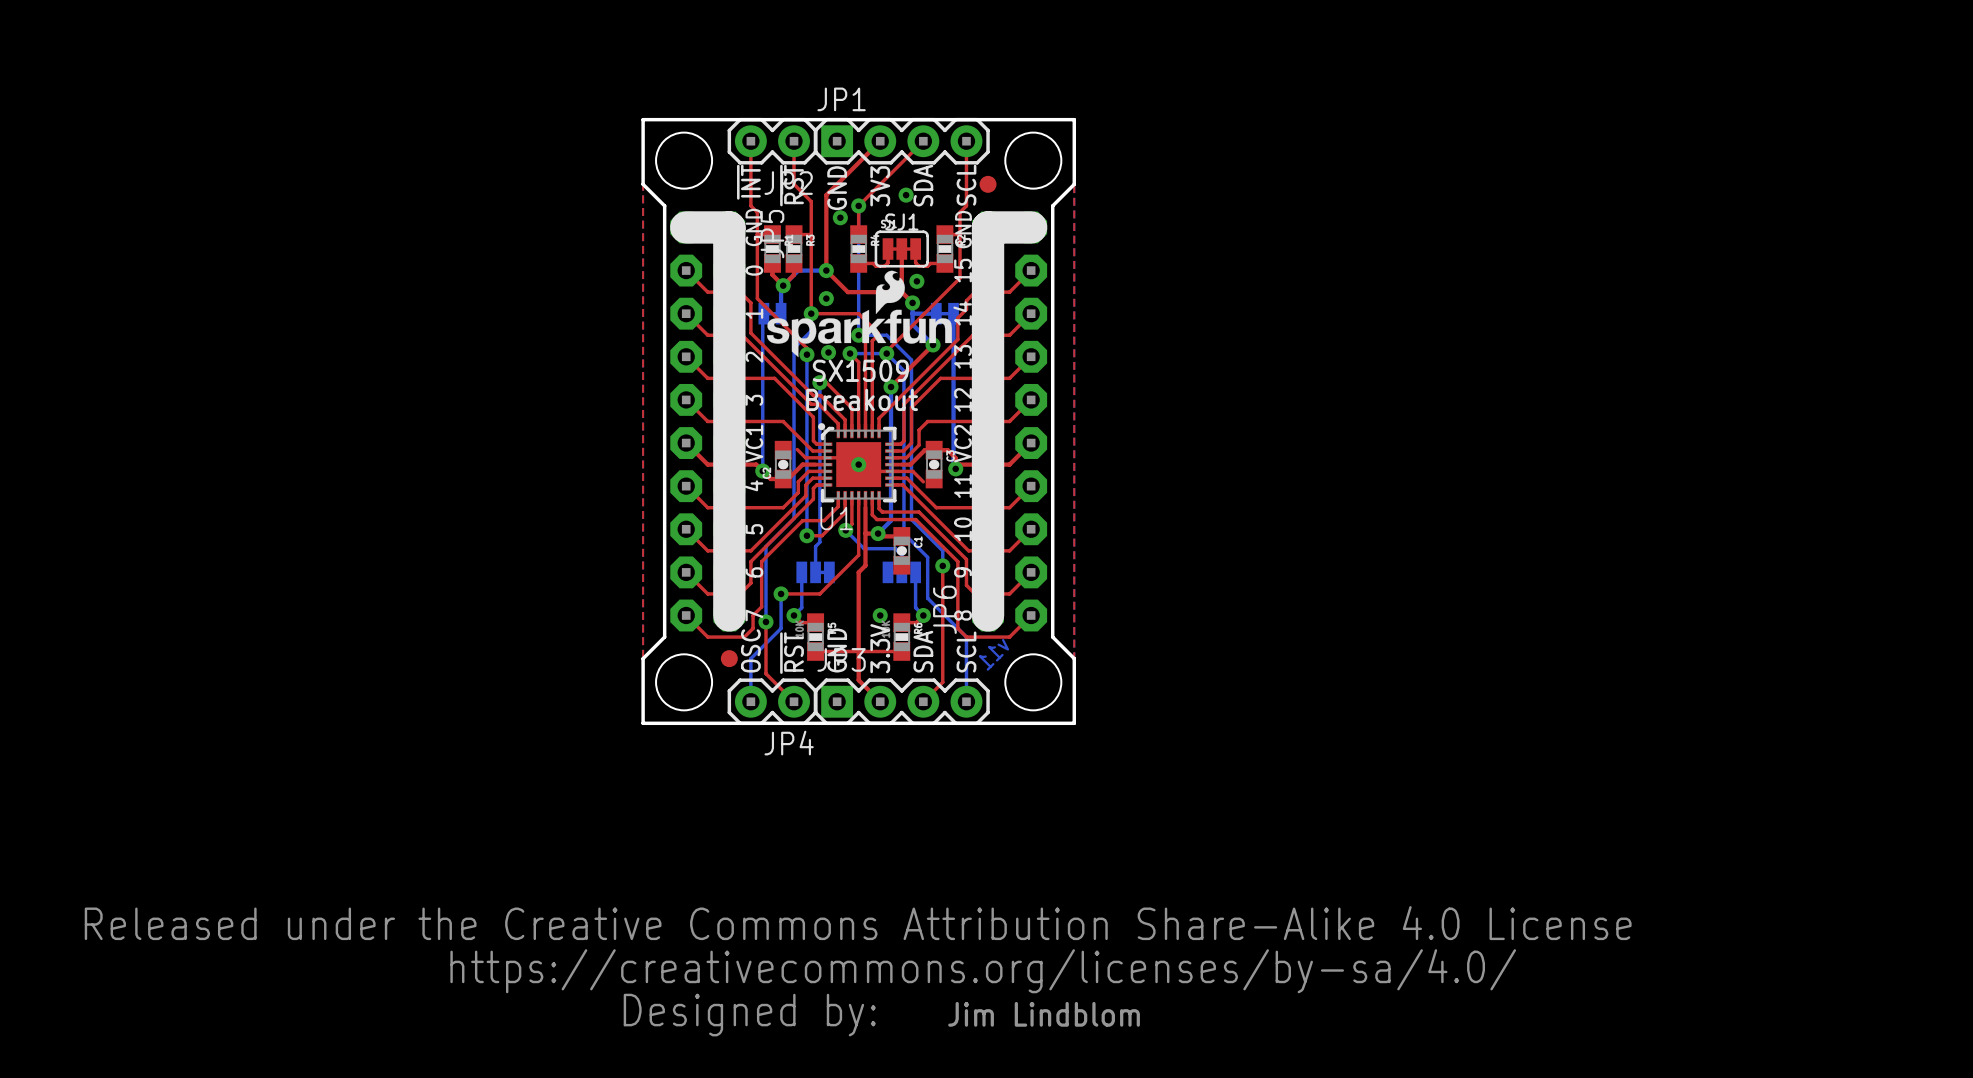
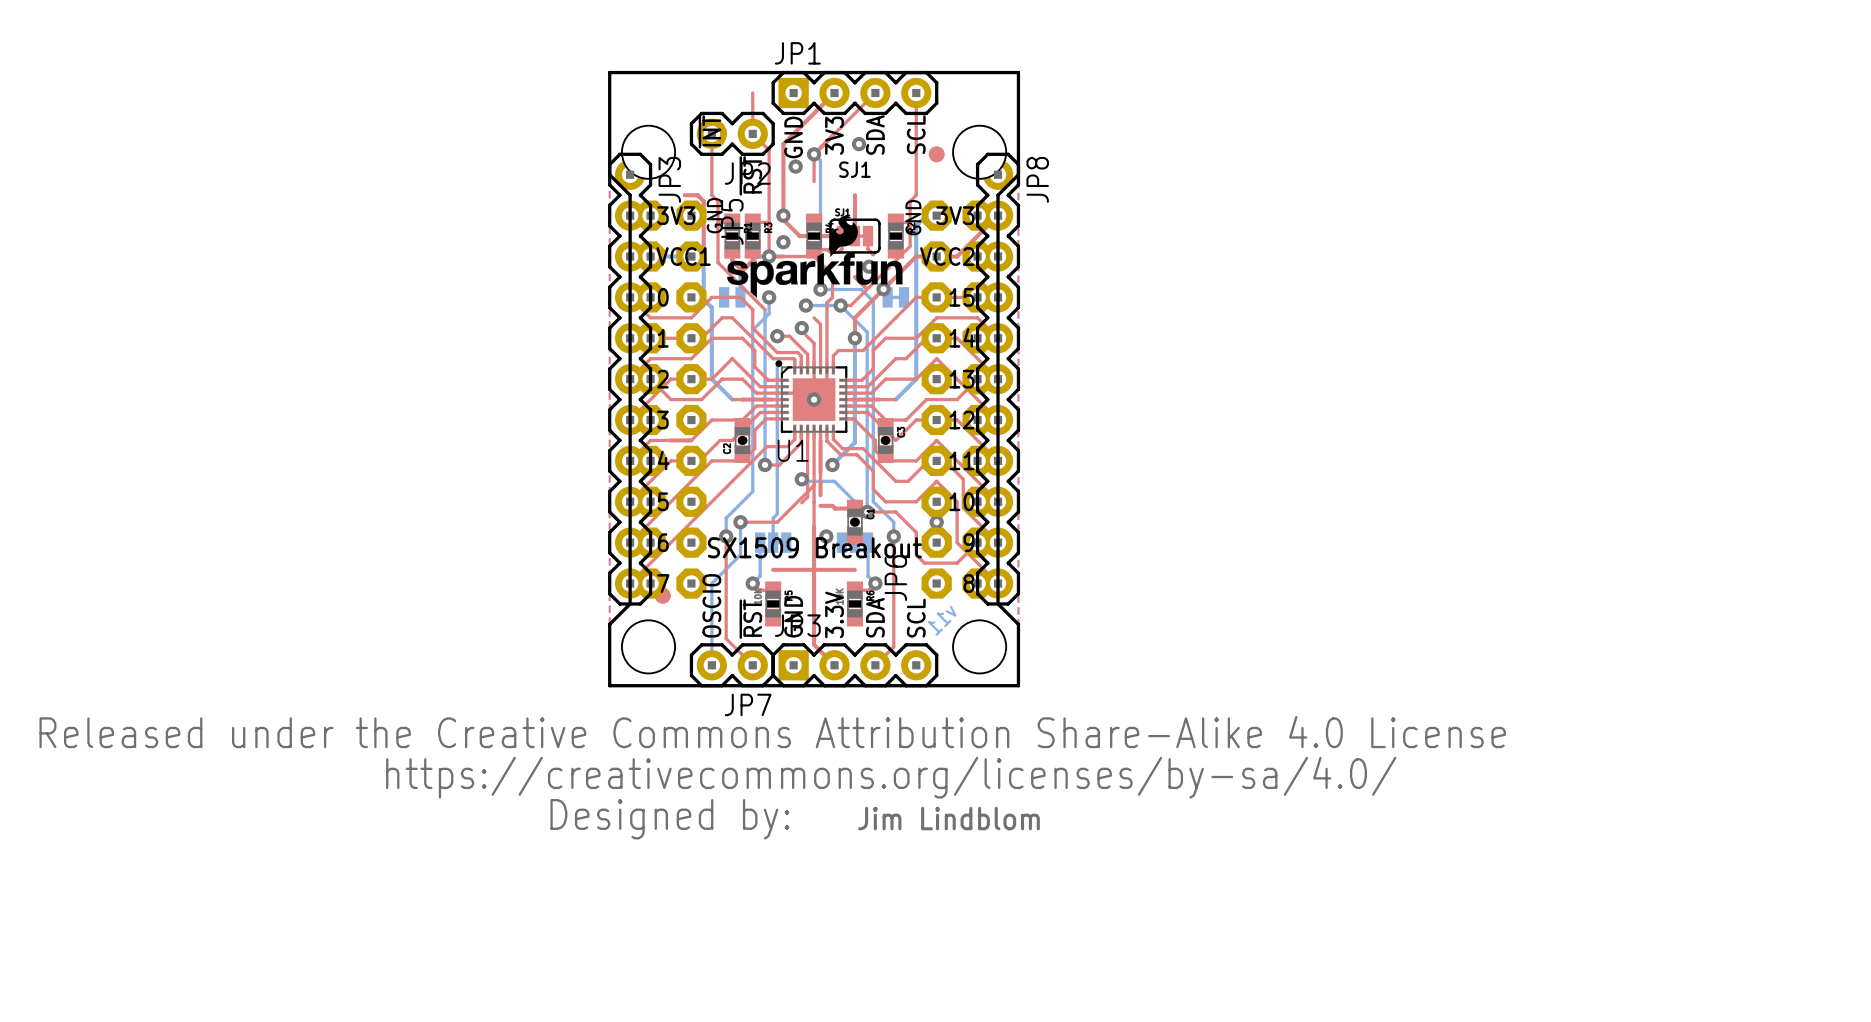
top track: none -> (834, 93) (783, 144) (783, 184)
top track: none -> (875, 93) (834, 133)
top track: none -> (916, 93) (916, 133)
board edge: (643, 119) (1074, 119) -> (609, 113) (609, 72) (1018, 72) (1018, 113)
top track: (794, 141) (794, 184) (811, 201) -> (752, 93) (752, 133) (769, 150) (769, 191)
JP1 position: (901, 141) -> (854, 93)
top track: (923, 141) (858, 205) (858, 234) -> none
via: none -> (859, 144)
top track: (858, 162) (826, 195) -> (814, 154) (814, 181)
via: none -> (814, 154)
via: none -> (795, 166)
text position: ~{INT} (748, 182) -> ~{INT} (710, 131)
part position: (988, 184) -> (936, 154)
text position: SDA (923, 185) -> SDA (875, 135)
text position: SCL (966, 185) -> SCL (916, 134)
text position: 3V3 (880, 186) -> 3V3 (834, 135)
text position: GND (837, 188) -> GND (793, 137)
via: (906, 195) -> none
top track: none -> (684, 195) (697, 195) (703, 201) (703, 256)
bottom track: (858, 205) (858, 335) (886, 335) (911, 360) (911, 519) (921, 529) -> (814, 154) (820, 160) (820, 289) (861, 289) (873, 301) (873, 501)
via: (858, 205) -> none
via position: (840, 217) -> (783, 215)
text position: SJ1 (901, 222) -> SJ1 (854, 169)
line: (686, 227) (729, 227) (729, 615) -> none
text: none -> 3V3 (676, 215)
text: none -> 3V3 (955, 215)
line: (1031, 227) (988, 227) (988, 615) -> none
top track: none -> (998, 215) (957, 256) (916, 256) (854, 317) (854, 338)
top track: (826, 231) (826, 270) (847, 292) (901, 292) (901, 249) -> (783, 219) (799, 236) (854, 236) (854, 195)
bottom track: none -> (922, 219) (916, 225) (916, 379) (895, 399)
via: none -> (783, 242)
top track: (960, 259) (960, 278) (886, 351) (886, 353) -> (910, 246) (850, 305) (840, 305)
top track: (944, 263) (930, 263) (927, 266) (919, 266) -> (873, 254) (871, 252)
bottom track: none -> (630, 256) (703, 256) (703, 299) (711, 307) (711, 379) (732, 399)
top track: (686, 270) (707, 292) (740, 292) (750, 302) (750, 333) (813, 395) (820, 395) (845, 419) (845, 431) -> none
text: none -> VCC1 (683, 256)
text rotation: 0° (754, 270) -> 90° clockwise (663, 297)
text position: 0 (754, 270) -> 0 (663, 297)
top track: (811, 270) (811, 313) (858, 313) (878, 333) (872, 341) -> (769, 256) (814, 256) (832, 274) (832, 297) (826, 302) (826, 323)
via: none -> (769, 256)
via: (826, 270) -> none
text rotation: 0° (963, 270) -> 90° clockwise (961, 297)
text position: 15 (963, 270) -> 15 (961, 297)
text: none -> VCC2 (947, 256)
top track: (1031, 270) (1009, 292) (975, 292) (966, 300) (966, 309) (957, 318) (957, 339) (879, 418) (879, 431) -> none
top track: (757, 277) (757, 298) (806, 348) (806, 354) -> (718, 262) (765, 309)
via: (783, 285) -> none
via: (826, 298) -> none
bottom track: (912, 302) (912, 324) (933, 344) -> none
via: (912, 302) -> none
via: none -> (820, 289)
via: none -> (883, 289)
top track: (686, 313) (707, 335) -> (630, 297) (650, 317) (671, 317)
text rotation: 0° (754, 313) -> 90° clockwise (663, 338)
text position: 1 (754, 313) -> 1 (663, 338)
bottom track: (763, 313) (762, 471) -> none
bottom track: (912, 313) (936, 313) -> none
bottom track: (953, 313) (953, 466) (955, 468) -> none
text rotation: 0° (962, 313) -> 90° clockwise (962, 337)
text position: 14 (962, 313) -> 14 (962, 337)
top track: (1031, 313) (1009, 335) -> (998, 338) (977, 317) (957, 317)
top track: none -> (998, 297) (916, 297) (863, 350) (838, 350) (833, 355) (833, 367)
drawing position: (859, 314) -> (814, 256)
bottom track: none -> (805, 305) (840, 305) (867, 332) (867, 511)
via: none -> (805, 305)
via: none -> (840, 305)
bottom track: none -> (765, 309) (765, 336)
top track: (729, 335) (742, 335) (811, 404) (818, 404) (838, 423) (838, 431) -> (691, 317) (711, 297) (740, 297) (752, 309) (752, 328) (777, 352) (797, 352) (801, 356) (801, 367)
via: (858, 335) -> none
top track: (988, 335) (972, 335) (903, 404) (903, 440) (900, 444) (892, 444) -> (936, 317) (916, 338) (885, 338) (873, 350) (873, 368) (862, 380) (845, 380)
top track: (933, 344) (891, 386) -> none
via: (933, 344) -> none
via: none -> (801, 328)
via: (828, 352) -> none
bottom track: (850, 353) (886, 353) (903, 370) (903, 533) (927, 557) (927, 598) (966, 637) (966, 701) -> none
via: (850, 353) -> none
via position: (886, 353) -> (854, 338)
via: (806, 354) -> none
top track: none -> (777, 336) (789, 336) (807, 354) (807, 367)
via: none -> (777, 336)
top track: none -> (630, 338) (701, 338) (722, 317) (732, 317) (773, 358) (793, 358) (794, 367)
top track: (686, 356) (707, 378) -> (630, 379) (650, 358) (671, 358)
bottom track: none -> (854, 338) (854, 442) (832, 464)
text rotation: 0° (963, 356) -> 90° clockwise (961, 379)
text position: 13 (963, 356) -> 13 (961, 379)
top track: (1031, 356) (1009, 378) (955, 378) -> (998, 379) (957, 338) (926, 338) (906, 358)
text rotation: 0° (754, 357) -> 90° clockwise (662, 379)
text position: 2 (754, 357) -> 2 (662, 379)
text: SX1509 (860, 370) -> none
top track: (729, 378) (774, 378) (813, 417) (813, 440) (816, 444) (825, 444) -> (691, 358) (711, 338) (742, 338) (754, 350) (754, 366) (768, 380) (782, 380)
top track: (944, 378) (940, 378) (911, 407) (911, 443) (903, 451) (892, 451) -> (895, 358) (867, 386) (845, 386)
top track: (819, 382) (826, 382) (851, 408) (851, 431) -> none
via: (819, 382) -> none
bottom track: (891, 386) (891, 520) (878, 533) -> none
via: (891, 386) -> none
top track: (865, 387) (865, 431) -> (807, 431) (807, 472)
JP3: none -> (630, 379)
text: Breakout (862, 399) -> none
text rotation: 0° (963, 399) -> 90° clockwise (961, 420)
text position: 12 (963, 399) -> 12 (961, 420)
JP8: none -> (998, 379)
text rotation: 0° (754, 400) -> 90° clockwise (662, 420)
text position: 3 (754, 400) -> 3 (662, 420)
top track: none -> (782, 386) (760, 386) (732, 358) (711, 379) (671, 379) (630, 420)
top track: none -> (845, 393) (871, 393) (885, 379) (916, 379) (936, 358) (998, 420)
top track: (740, 421) (772, 421) -> (701, 399) (722, 379) (742, 379) (756, 393) (814, 393)
top track: (783, 421) (812, 451) (825, 451) -> (742, 399) (782, 399)
via: none -> (814, 399)
top track: (927, 421) (919, 430) (919, 445) (906, 457) (892, 457) -> (879, 399) (845, 399)
top track: (944, 421) (977, 421) -> (848, 406) (871, 406) (885, 420) (906, 420) (926, 399)
U1 footprint: [817, 423, 900, 506] -> [775, 360, 853, 439]
top track: none -> (782, 412) (760, 412) (732, 440) (720, 440) (699, 460) (671, 460) (630, 501)
top track: none -> (845, 412) (867, 412) (895, 440) (916, 420) (957, 420) (998, 460)
top track: none -> (782, 418) (766, 418) (754, 430) (754, 448) (742, 460) (711, 460) (630, 542)
top track: none -> (845, 418) (853, 418) (875, 440) (875, 450) (885, 460) (916, 460) (936, 440) (998, 501)
top track: (686, 443) (707, 464) -> (630, 460) (650, 440) (671, 440)
text: VC1 (754, 443) -> none
text: VC2 (963, 443) -> none
top track: (1031, 443) (1009, 464) (960, 464) (955, 468) (955, 458) (947, 450) (924, 450) (910, 464) (892, 464) -> none
top track: (797, 449) (805, 457) (851, 457) (865, 471) (912, 471) (923, 481) -> none
top track: none -> (801, 431) (801, 443) (779, 464) (765, 464)
top track: none -> (820, 431) (820, 472)
top track: none -> (826, 431) (826, 441) (840, 454) (856, 454) (873, 471) (873, 489) (885, 501) (916, 501) (936, 481) (957, 501) (957, 542) (998, 583)
top track: (729, 464) (756, 464) (770, 479) (788, 479) (802, 464) (825, 464) -> (691, 440) (711, 420) (742, 420) (756, 406) (782, 406)
top track: none -> (814, 440) (814, 472)
via: (858, 464) -> none
via: (955, 468) -> none
via: (762, 471) -> none
top track: (808, 471) (825, 471) -> (766, 446) (787, 446) (794, 439) (794, 431)
top track: (825, 478) (812, 478) (805, 485) (805, 495) (750, 550) (707, 550) (686, 529) -> none
top track: (892, 478) (906, 478) (936, 507) (944, 507) -> (833, 431) (833, 439) (842, 448) (863, 448) (895, 481)
top track: (798, 481) (798, 492) (783, 507) (707, 507) (686, 486) -> (756, 456) (630, 583)
top track: (825, 484) (816, 484) (813, 488) (813, 499) (750, 561) (750, 583) (740, 593) (707, 593) (686, 572) -> none
top track: (892, 484) (902, 484) (968, 550) (1009, 550) (1031, 529) -> none
text rotation: 0° (753, 485) -> 90° clockwise (663, 460)
text position: 4 (753, 485) -> 4 (663, 460)
text rotation: 0° (963, 486) -> 90° clockwise (961, 460)
text position: 11 (963, 486) -> 11 (961, 460)
top track: (1031, 486) (1009, 507) (957, 507) -> (998, 542) (963, 507) (963, 479) (944, 460) (928, 460) (908, 481)
bottom track: (806, 490) (806, 535) -> none
via: none -> (765, 464)
via: none -> (832, 464)
top track: (838, 498) (838, 506) (824, 520) (802, 520) (761, 561) (761, 606) (753, 615) (753, 628) (744, 637) (707, 637) (686, 615) -> none
top track: (845, 498) (845, 512) (822, 535) (806, 535) -> none
top track: (872, 498) (872, 514) (877, 519) (915, 519) (957, 561) (957, 628) (966, 637) (1009, 637) (1031, 615) -> none
top track: (879, 498) (879, 508) (882, 512) (919, 512) (966, 561) -> (867, 511) (895, 511) (916, 532)
via: none -> (801, 479)
top track: (865, 522) (865, 565) (858, 572) -> (814, 526) (814, 542)
text rotation: 0° (754, 529) -> 90° clockwise (663, 501)
text position: 5 (754, 529) -> 5 (663, 501)
text rotation: 0° (963, 529) -> 90° clockwise (961, 501)
text position: 10 (963, 529) -> 10 (961, 501)
bottom track: (845, 530) (864, 548) (895, 548) (901, 555) -> (801, 479) (803, 481) (834, 481) (854, 501) (854, 526)
via: (845, 530) -> none
via: (878, 533) -> none
via: (806, 535) -> none
via: none -> (867, 511)
via: none -> (740, 522)
via: none -> (936, 522)
top track: (858, 555) (819, 593) (781, 593) -> (814, 485) (777, 522) (740, 522)
bottom track: (765, 565) (765, 621) -> none
top track: none -> (726, 536) (726, 589)
via: none -> (726, 536)
via: none -> (826, 536)
text rotation: 0° (754, 572) -> 90° clockwise (663, 542)
text position: 6 (754, 572) -> 6 (663, 542)
text rotation: 0° (963, 572) -> 90° clockwise (968, 542)
text position: 9 (963, 572) -> 9 (968, 542)
text: none -> SX1509 Breakout (814, 547)
bottom track: (781, 593) (781, 628) (750, 658) -> (740, 522) (740, 554) (711, 583) (711, 624)
via: (781, 593) -> none
text rotation: 0° (754, 615) -> 90° clockwise (663, 583)
text position: 7 (754, 615) -> 7 (663, 583)
via: (880, 615) -> none
text rotation: 0° (963, 615) -> 90° clockwise (968, 583)
text position: 8 (963, 615) -> 8 (968, 583)
via: (765, 621) -> none
text: OSC (750, 650) -> OSCIO (711, 605)
top track: (815, 651) (901, 651) -> (773, 569) (854, 569)
part position: (729, 658) -> (662, 595)
JP4 name: JP4 (789, 743) -> JP7 (748, 704)
drawing position: (858, 971) -> (772, 777)
text position: Jim Lindblom (1044, 1014) -> Jim Lindblom (948, 818)

